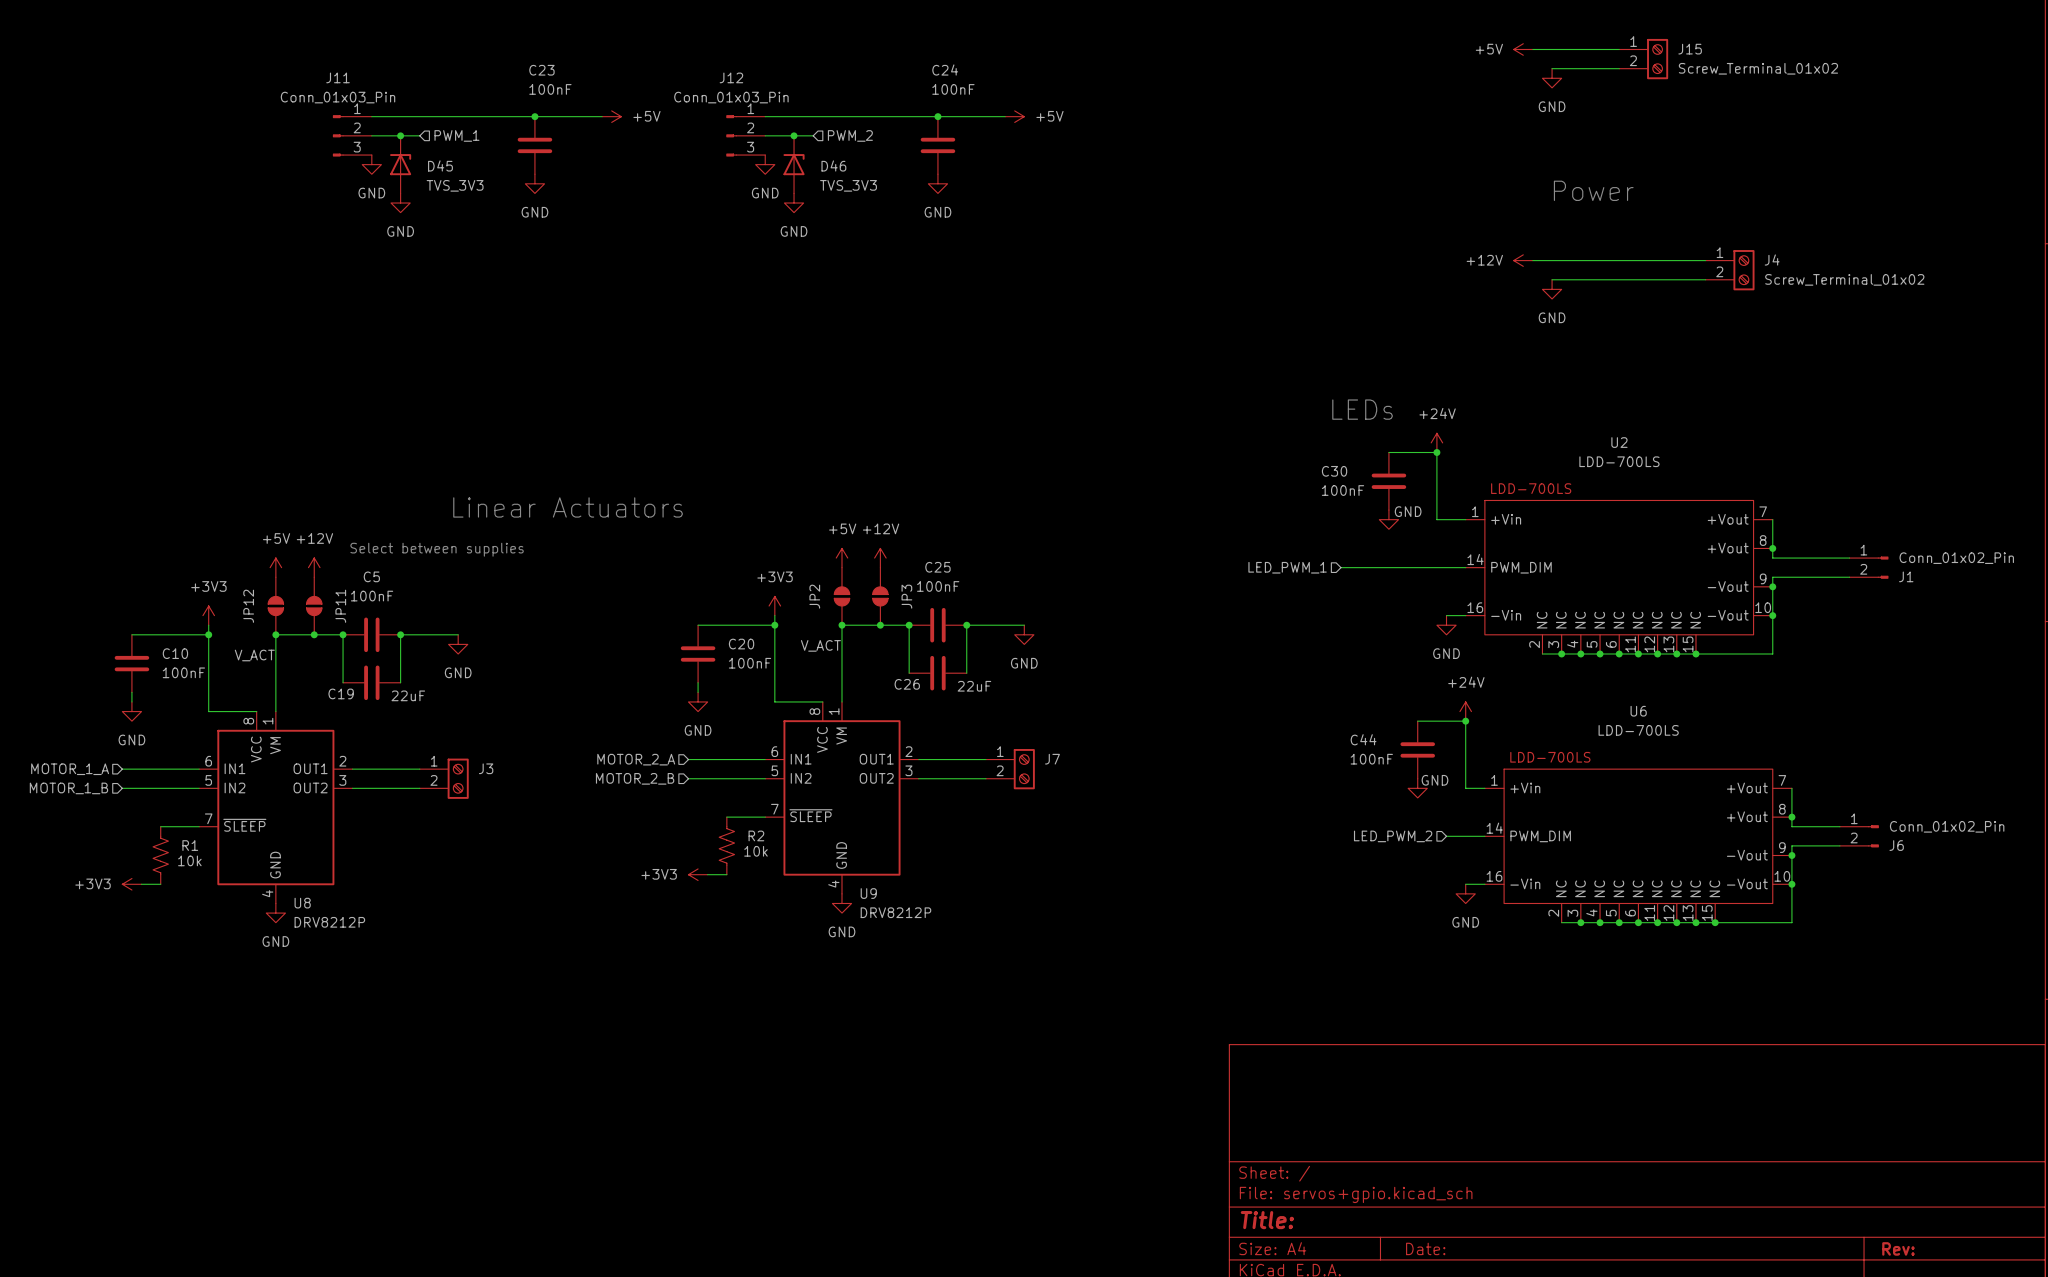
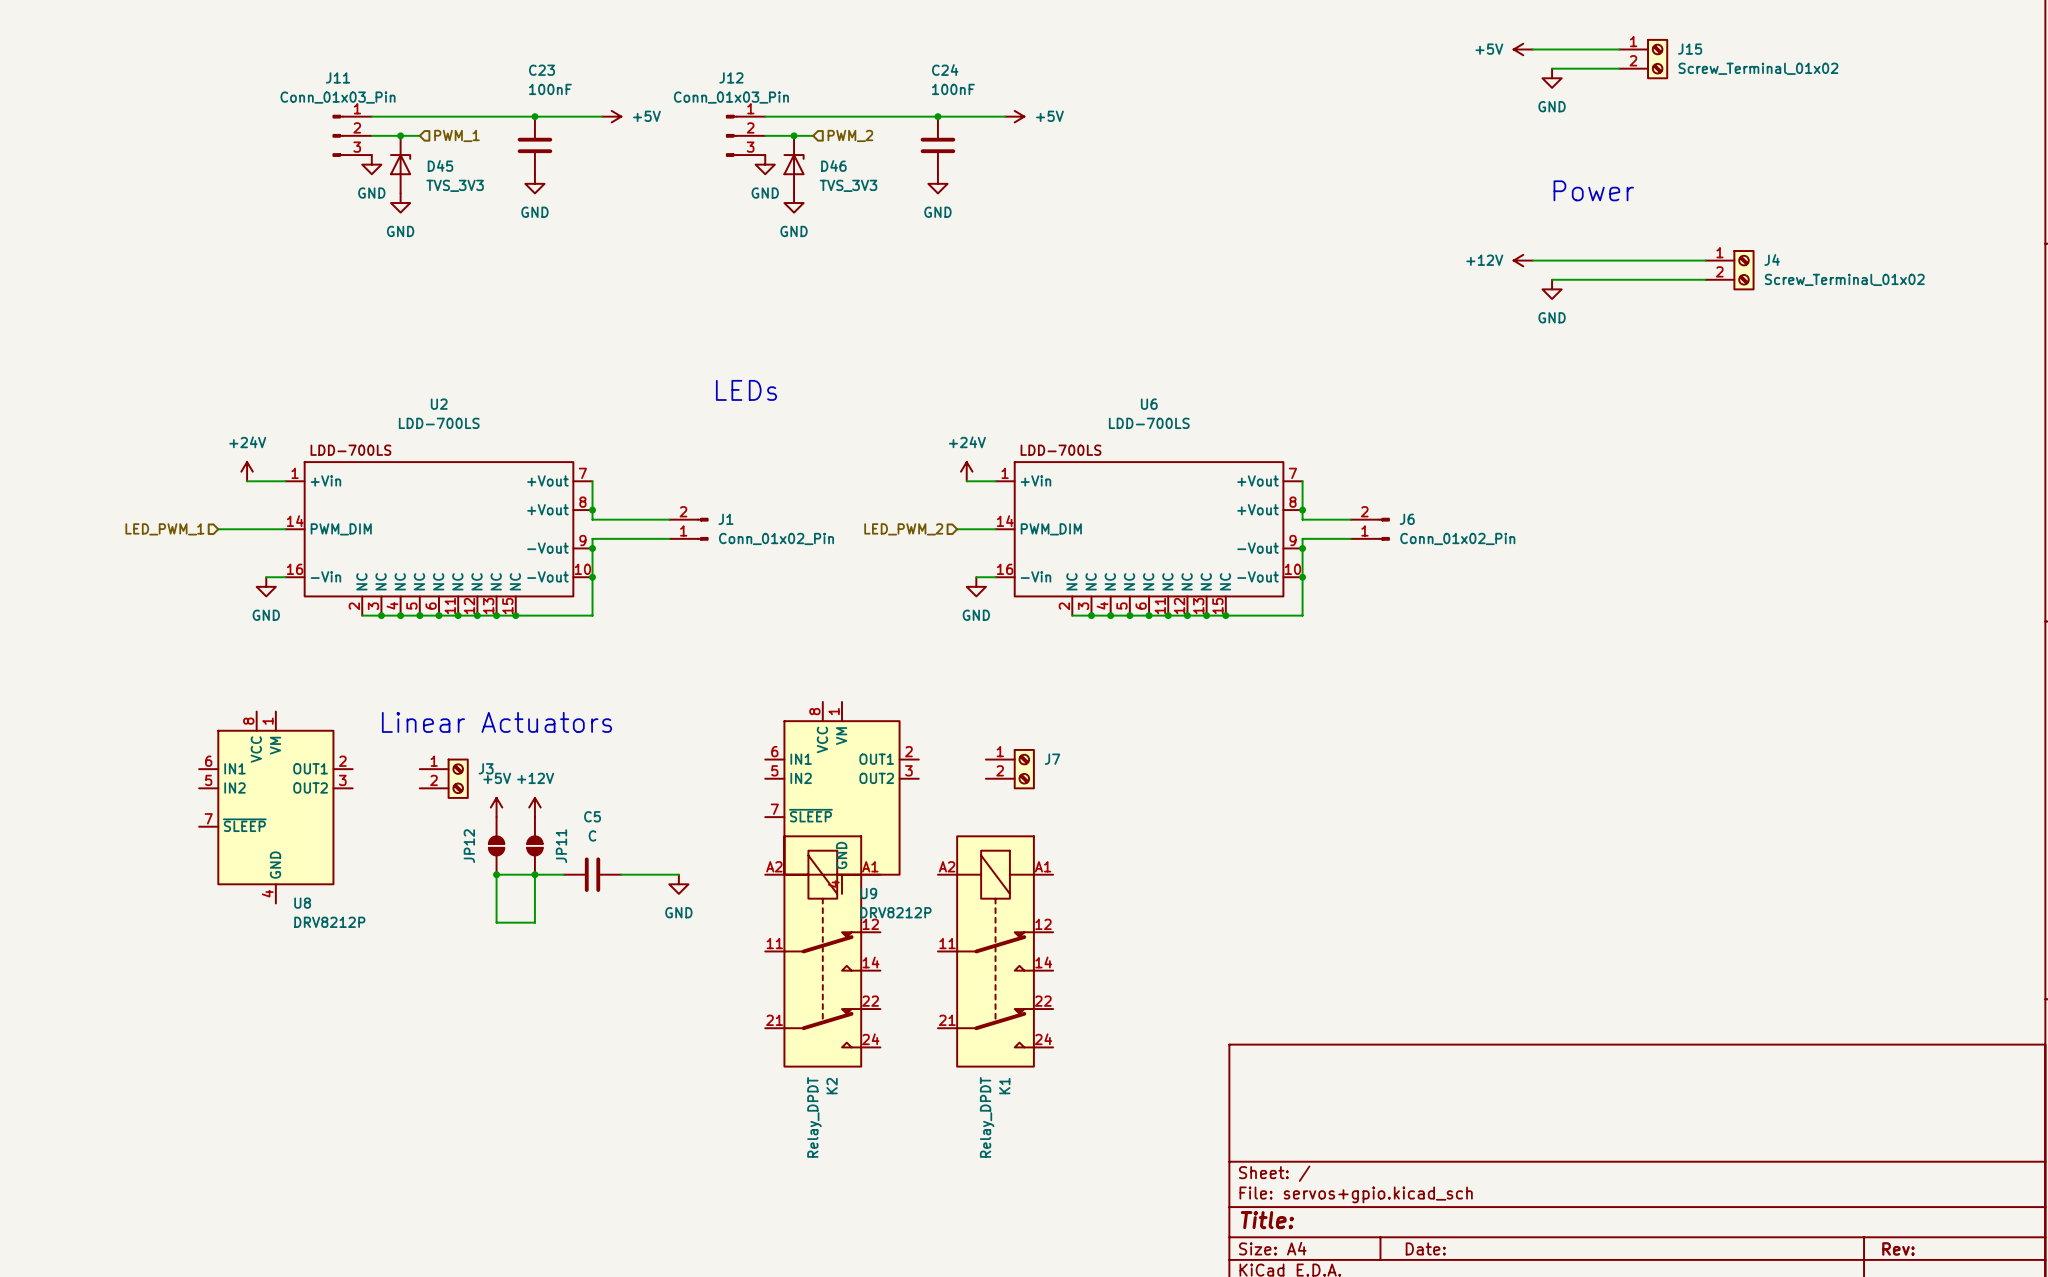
text: none -> LEDs (746, 390)
text: LEDs (1362, 409) -> none
power symbol: +24V (1436, 442) -> none
wire: (1388, 452) (1436, 452) (1436, 519) (1465, 519) -> none
junction: (1436, 452) -> none
power symbol: none -> +24V (247, 471)
power symbol: none -> +24V (966, 471)
wire: none -> (247, 481) (285, 481)
wire: none -> (592, 481) (592, 519) (669, 519)
wire: none -> (966, 481) (995, 481)
wire: none -> (1302, 481) (1302, 519) (1350, 519)
C30: 100nF (1388, 481) -> none
text: Linear Actuators (568, 507) -> none
junction: none -> (592, 510)
junction: none -> (1302, 510)
power symbol: GND (1388, 519) -> none
wire: (1772, 519) (1772, 558) (1849, 558) -> none
hierarchical label: none -> LED_PWM_1 (164, 529)
wire: none -> (218, 529) (285, 529)
hierarchical label: none -> LED_PWM_2 (903, 529)
wire: none -> (957, 529) (995, 529)
wire: none -> (669, 538) (592, 538) (592, 615) (362, 615)
wire: none -> (1350, 538) (1302, 538) (1302, 615) (1072, 615)
junction: none -> (592, 548)
junction: none -> (1302, 548)
junction: (1772, 548) -> none
text: Select between supplies (437, 549) -> none
power symbol: +5V (842, 558) -> none
power symbol: +12V (880, 558) -> none
power symbol: +5V (275, 567) -> none
power symbol: +12V (314, 567) -> none
hierarchical label: LED_PWM_1 (1287, 567) -> none
wire: (1340, 567) (1465, 567) -> none
J1 position: (1869, 567) -> (688, 529)
J1 flip: as is (1883, 567) -> up-down (702, 529)
wire: none -> (266, 577) (285, 577)
junction: none -> (592, 577)
wire: none -> (976, 577) (995, 577)
junction: none -> (1302, 577)
U2 position: (1619, 577) -> (438, 538)
wire: (1849, 577) (1772, 577) (1772, 654) (1542, 654) -> none
power symbol: none -> GND (266, 586)
junction: (1772, 586) -> none
C5 value: 100nF (372, 596) -> C (592, 835)
JP2: (842, 596) -> none
JP3: (880, 596) -> none
JP12 position: (275, 606) -> (496, 845)
JP11 position: (314, 606) -> (534, 845)
power symbol: +3V3 (774, 606) -> none
power symbol: +3V3 (208, 615) -> none
junction: none -> (381, 615)
junction: none -> (400, 615)
junction: none -> (419, 615)
junction: none -> (438, 615)
junction: none -> (458, 615)
junction: none -> (477, 615)
junction: none -> (496, 615)
junction: none -> (515, 615)
wire: (774, 615) (774, 701) (822, 701) -> none
junction: none -> (1091, 615)
junction: none -> (1110, 615)
junction: none -> (1129, 615)
junction: none -> (1149, 615)
junction: none -> (1168, 615)
junction: none -> (1187, 615)
junction: none -> (1206, 615)
junction: none -> (1225, 615)
wire: (1446, 615) (1465, 615) -> none
junction: (1772, 615) -> none
wire: (208, 625) (208, 711) (256, 711) -> none
wire: (698, 625) (774, 625) -> none
junction: (774, 625) -> none
junction: (842, 625) -> none
junction: (880, 625) -> none
junction: (909, 625) -> none
C25: 100nF (937, 625) -> none
junction: (966, 625) -> none
wire: (1024, 625) (966, 625) (966, 673) -> none
power symbol: GND (1446, 625) -> none
wire: (131, 634) (208, 634) -> none
junction: (208, 634) -> none
junction: (275, 634) -> none
junction: (314, 634) -> none
junction: (343, 634) -> none
C5 position: (371, 634) -> (592, 874)
junction: (400, 634) -> none
wire: (458, 634) (400, 634) (400, 682) -> none
power symbol position: GND (1024, 634) -> GND (976, 586)
power symbol: GND (458, 644) -> none
label: V_ACT (820, 645) -> none
C20: 100nF (698, 654) -> none
junction: (1561, 654) -> none
junction: (1580, 654) -> none
junction: (1600, 654) -> none
junction: (1619, 654) -> none
junction: (1638, 654) -> none
junction: (1657, 654) -> none
junction: (1676, 654) -> none
junction: (1695, 654) -> none
label: V_ACT (254, 655) -> none
C10: 100nF (131, 663) -> none
wire: (909, 673) (909, 625) (842, 625) (842, 701) -> none
C26: 22uF (937, 673) -> none
wire: (343, 682) (343, 634) (275, 634) (275, 711) -> none
C19: 22uF (371, 682) -> none
wire: (698, 682) (698, 692) -> none
wire: (131, 692) (131, 701) -> none
power symbol: GND (698, 701) -> none
power symbol: GND (131, 711) -> none
power symbol: +24V (1465, 711) -> none
wire: (1417, 721) (1465, 721) (1465, 788) (1484, 788) -> none
junction: (1465, 721) -> none
text: none -> Linear Actuators (497, 722)
C44: 100nF (1417, 749) -> none
hierarchical label: MOTOR_2_A (636, 759) -> none
wire: (688, 759) (765, 759) -> none
wire: (918, 759) (985, 759) -> none
hierarchical label: MOTOR_1_A (70, 769) -> none
wire: (122, 769) (199, 769) -> none
wire: (352, 769) (419, 769) -> none
hierarchical label: MOTOR_2_B (635, 778) -> none
wire: (688, 778) (765, 778) -> none
wire: (918, 778) (985, 778) -> none
hierarchical label: MOTOR_1_B (68, 788) -> none
wire: (122, 788) (199, 788) -> none
wire: (352, 788) (419, 788) -> none
power symbol: GND (1417, 788) -> none
wire: (1791, 788) (1791, 826) (1839, 826) -> none
power symbol: none -> +5V (496, 807)
power symbol: none -> +12V (534, 807)
wire: (726, 817) (765, 817) -> none
junction: (1791, 817) -> none
wire: (160, 826) (199, 826) -> none
hierarchical label: LED_PWM_2 (1393, 836) -> none
wire: (1446, 836) (1484, 836) -> none
J6 position: (1859, 836) -> (1370, 529)
J6 flip: as is (1873, 836) -> up-down (1384, 529)
R2: 10k (726, 845) -> none
U6 position: (1638, 845) -> (1149, 538)
wire: (1839, 845) (1791, 845) (1791, 922) (1561, 922) -> none
R1: 10k (160, 855) -> none
junction: (1791, 855) -> none
junction: none -> (496, 874)
wire: none -> (534, 874) (534, 922) (496, 922) (496, 874) (563, 874)
junction: none -> (534, 874)
wire: none -> (621, 874) (678, 874)
power symbol: +3V3 (698, 874) -> none
wire: (707, 874) (726, 874) -> none
power symbol: +3V3 (131, 884) -> none
wire: (141, 884) (160, 884) -> none
power symbol: none -> GND (678, 884)
wire: (1465, 884) (1484, 884) -> none
junction: (1791, 884) -> none
power symbol: GND (1465, 893) -> none
power symbol: GND (842, 903) -> none
power symbol: GND (275, 913) -> none
junction: (1580, 922) -> none
junction: (1600, 922) -> none
junction: (1619, 922) -> none
junction: (1638, 922) -> none
junction: (1657, 922) -> none
junction: (1676, 922) -> none
junction: (1695, 922) -> none
junction: (1715, 922) -> none
K2: none -> Relay_DPDT (822, 951)
K1: none -> Relay_DPDT (995, 951)

